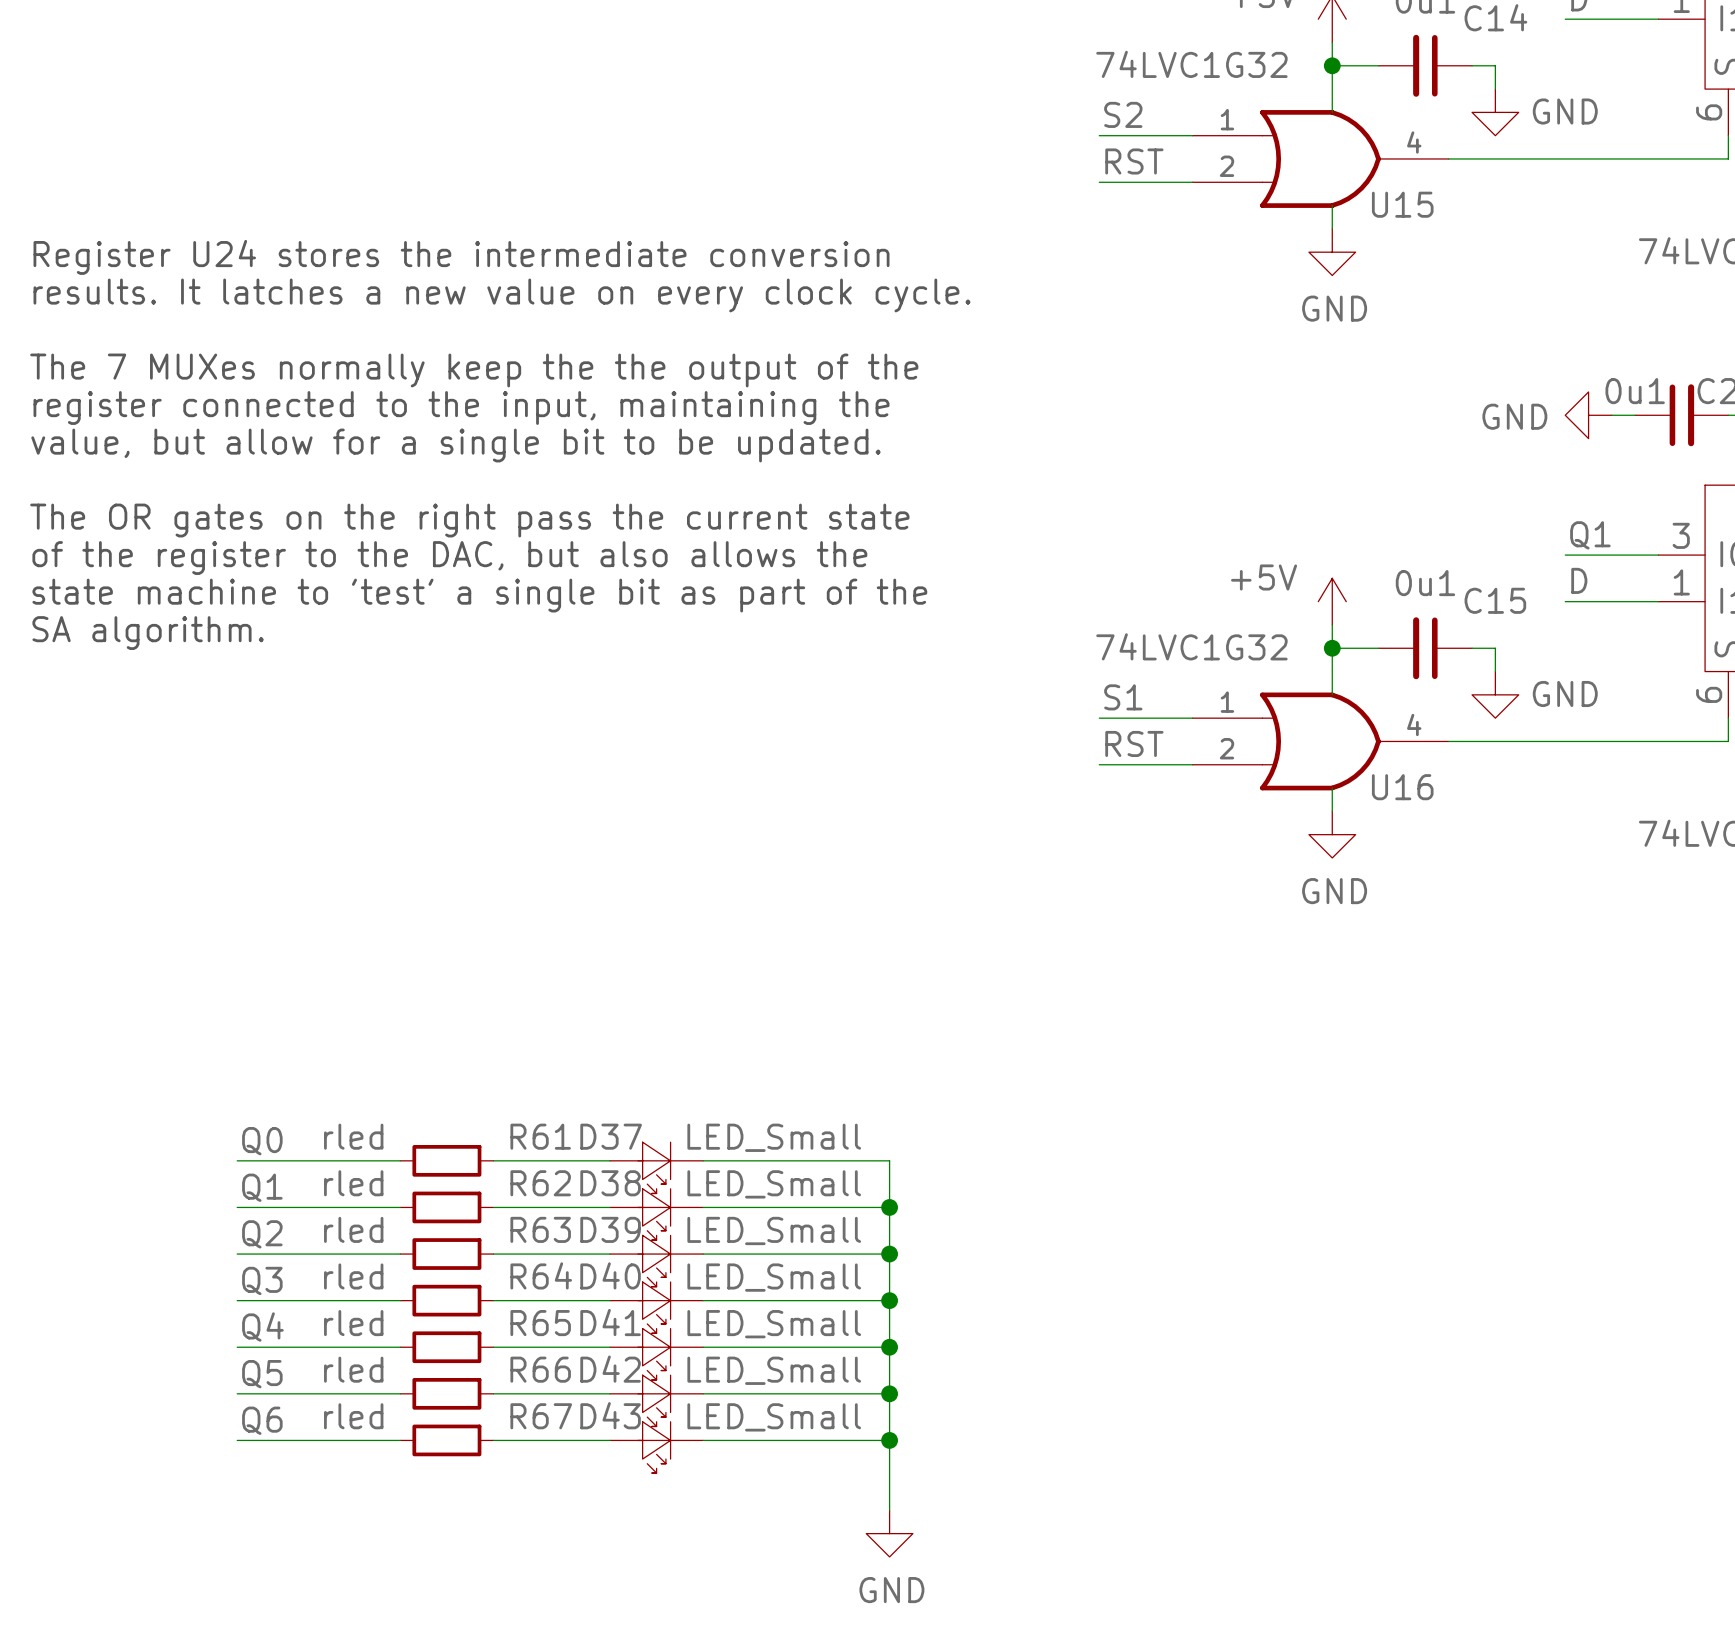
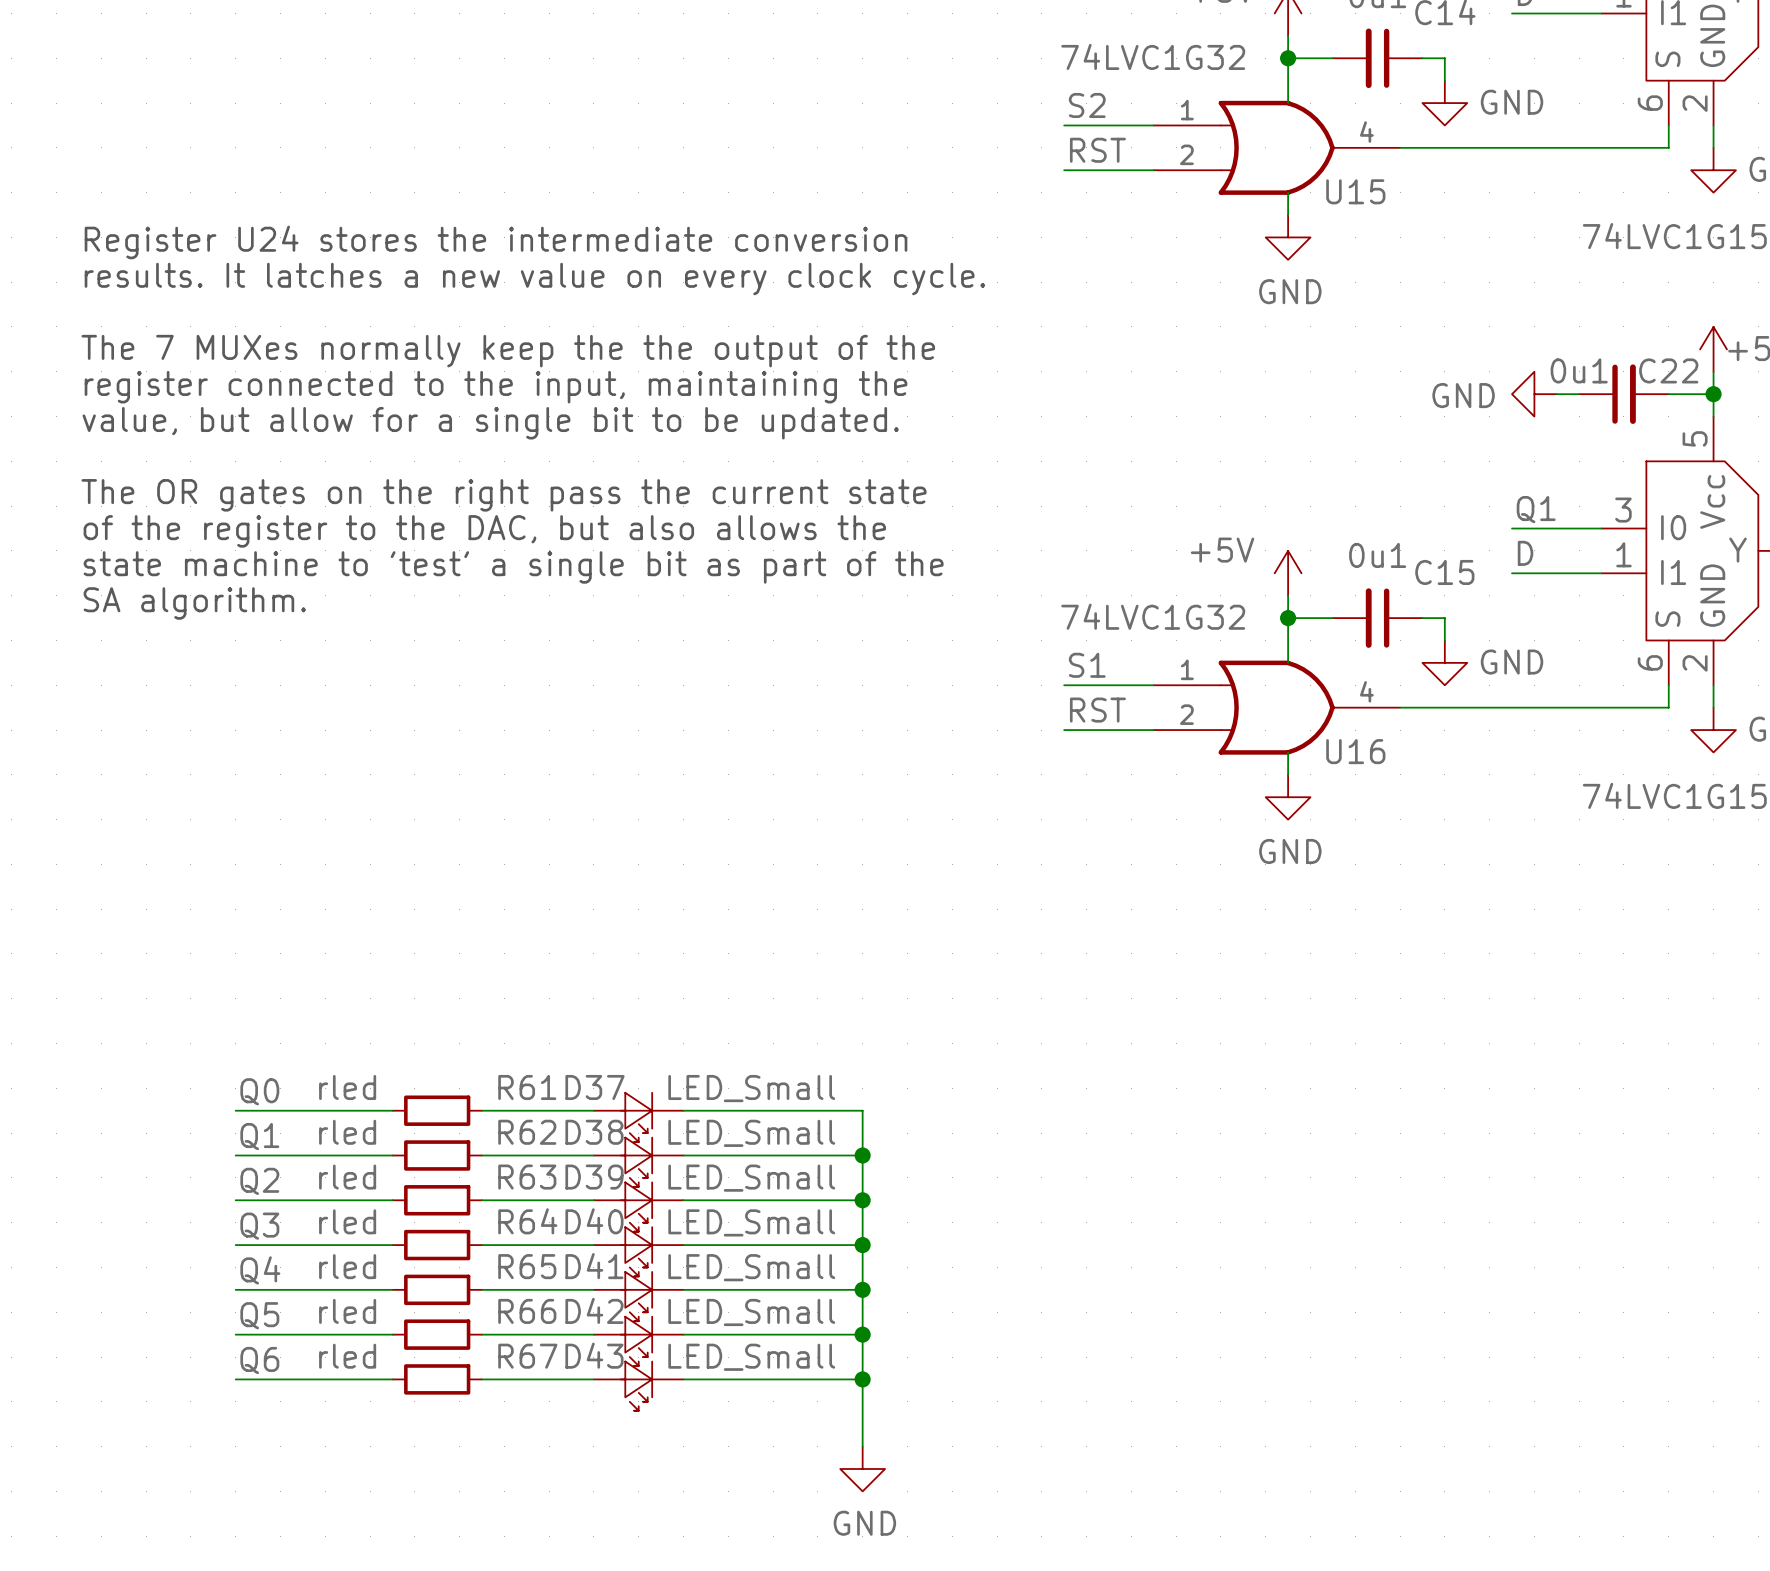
text position: Register U24 stores the intermediate conversion (461, 257) -> Register U24 stores the intermediate conversion (496, 242)
text position: results. It latches a new value on every clock cycle. (502, 295) -> results. It latches a new value on every clock cycle. (534, 279)
text position: The 7 MUXes normally keep the the output of the (474, 370) -> The 7 MUXes normally keep the the output of the (508, 351)
text position: register connected to the input, maintaining the (461, 407) -> register connected to the input, maintaining the (496, 387)
text position: value, but allow for a single bit to be updated. (455, 445) -> value, but allow for a single bit to be updated. (490, 423)
text position: The OR gates on the right pass the current state (469, 520) -> The OR gates on the right pass the current state (504, 495)
text position: of the register to the DAC, but also allows the (449, 558) -> of the register to the DAC, but also allows the (484, 531)
text position: state machine to 'test' a single bit as part of the (479, 595) -> state machine to 'test' a single bit as part of the (513, 567)
text position: SA algorithm. (148, 633) -> SA algorithm. (194, 603)

